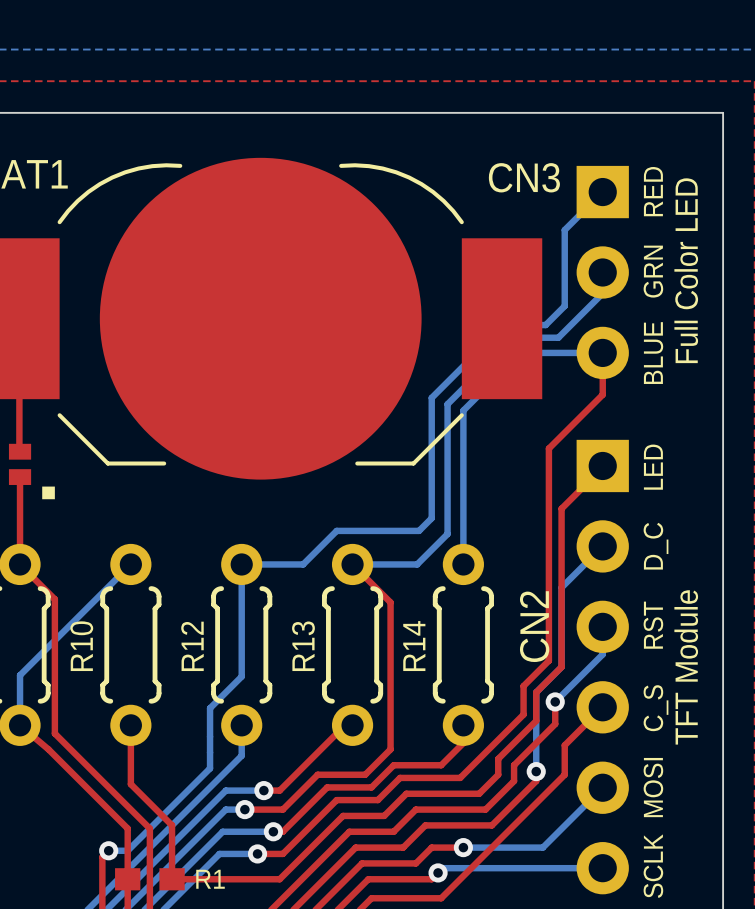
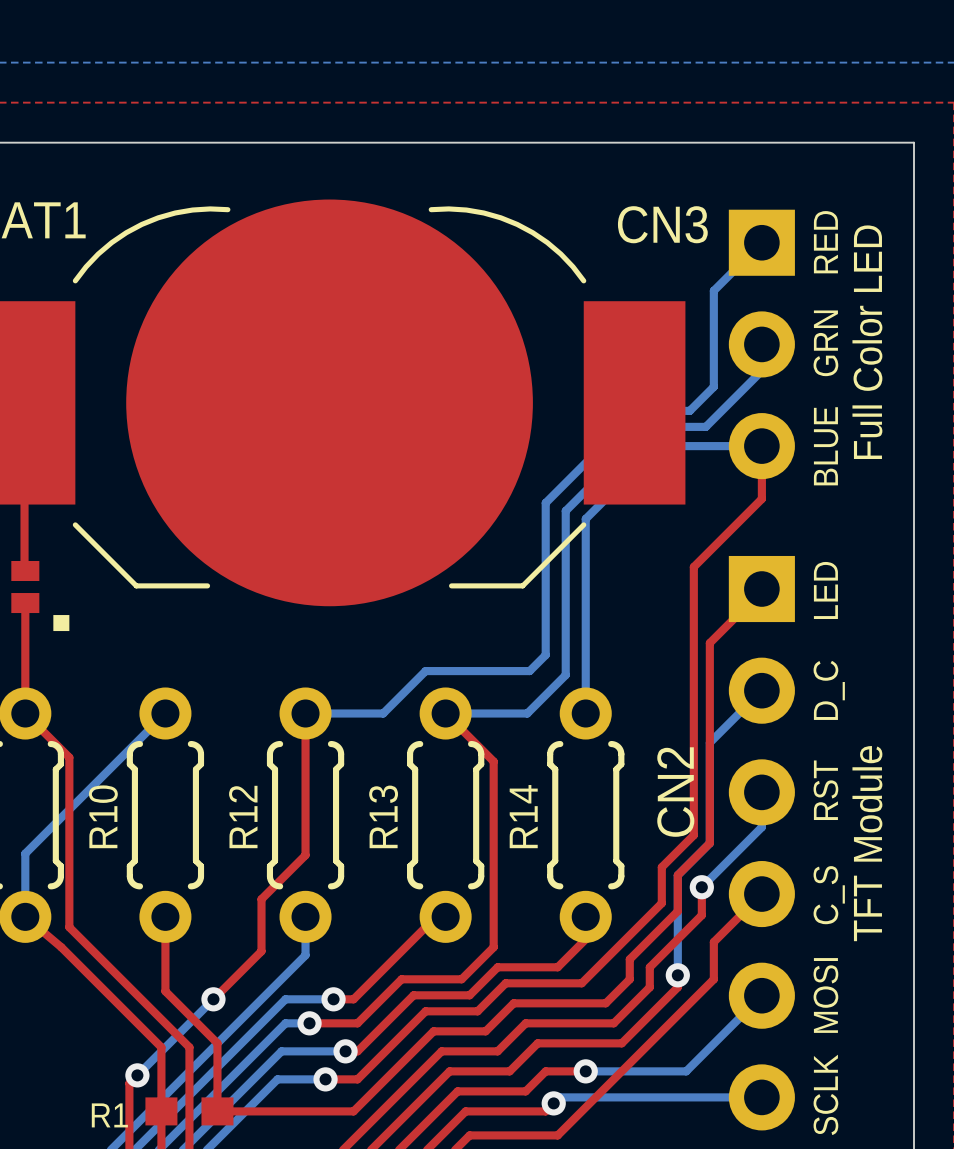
top track: none -> (305, 713) (305, 855) (261, 899) (261, 951) (213, 999)
bottom track: (241, 564) (241, 676) (210, 708) (210, 768) (127, 850) (108, 850) -> (213, 999) (137, 1075)
via: none -> (213, 999)
R1 name position: R1 (210, 879) -> R1 (109, 1115)

